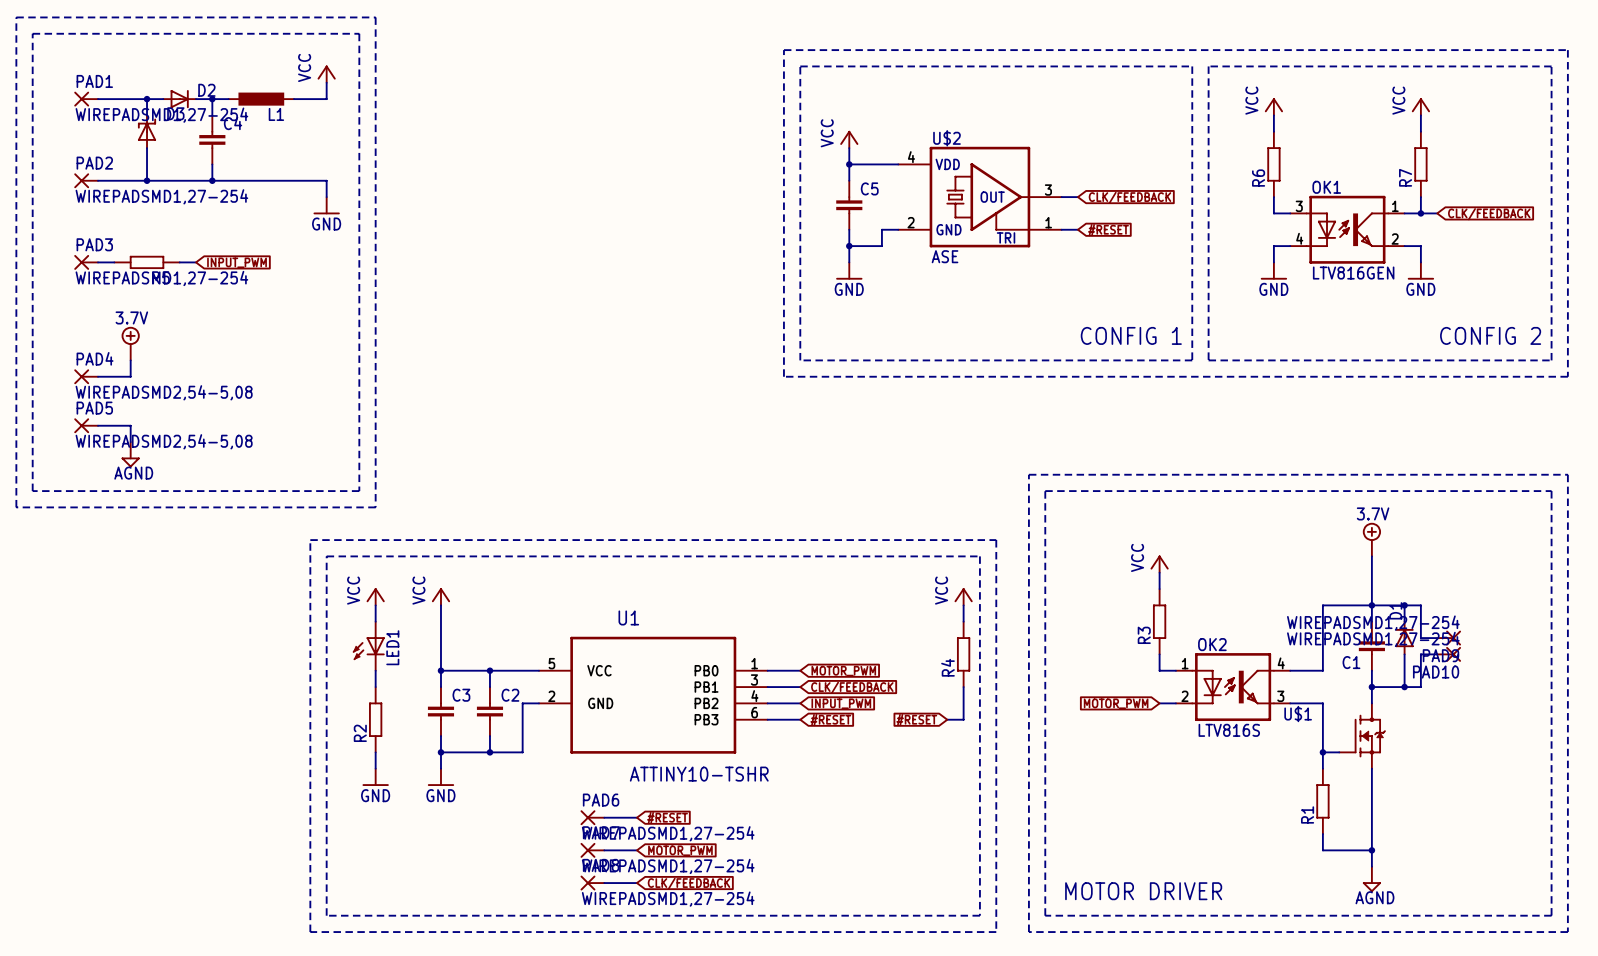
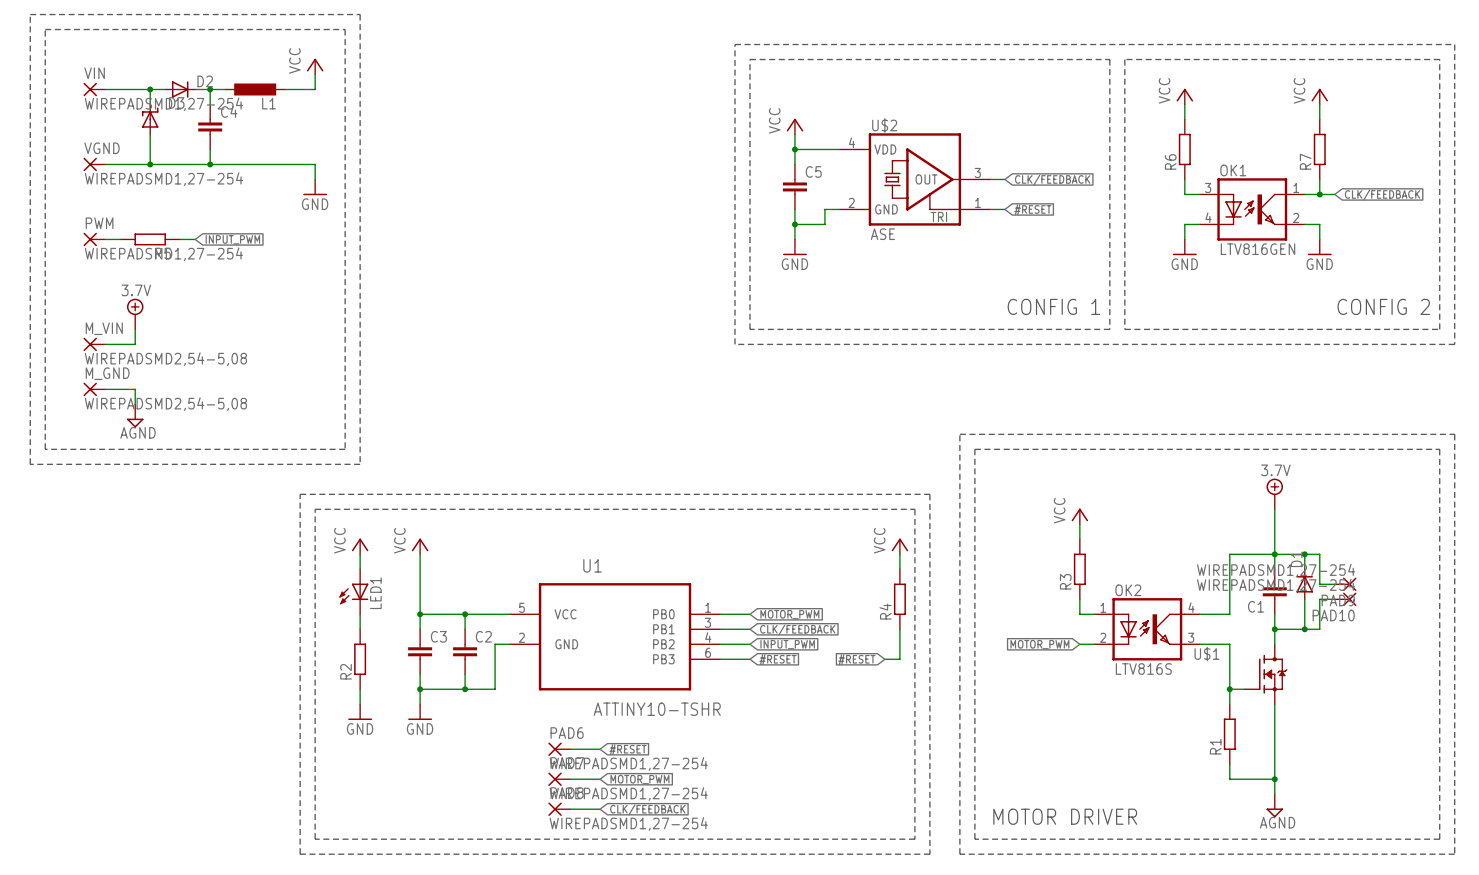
PAD1 name: PAD1 (94, 81) -> VIN (94, 73)
PAD2 name: PAD2 (94, 163) -> VGND (102, 148)
PAD3 name: PAD3 (94, 244) -> PWM (99, 223)
PAD4 name: PAD4 (95, 358) -> M_VIN (104, 328)
PAD5 name: PAD5 (94, 408) -> M_GND (107, 373)

